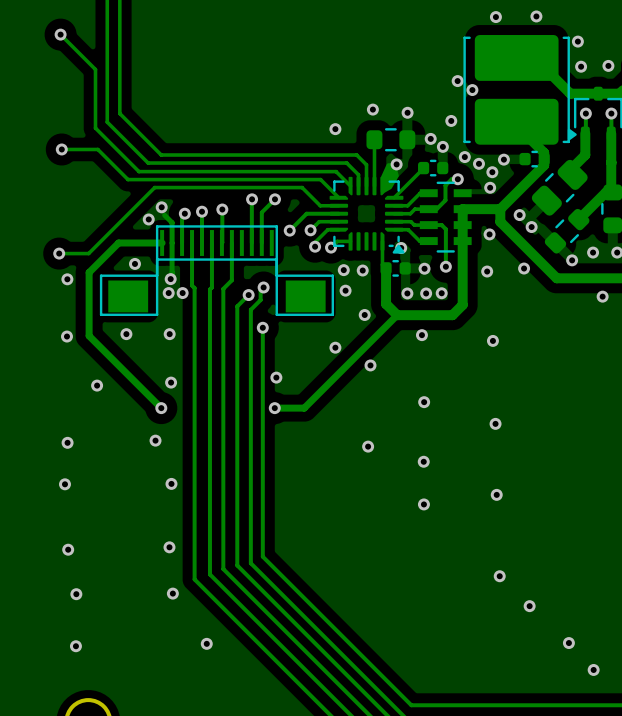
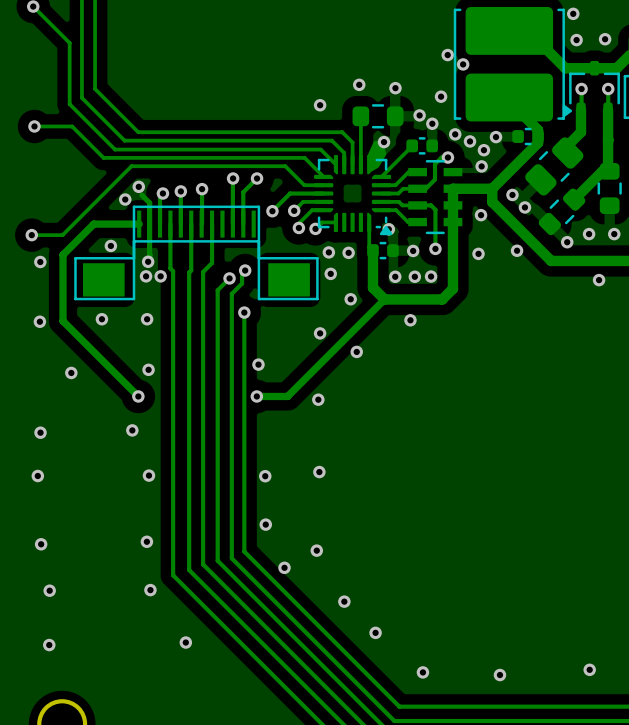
via: (492, 340) -> none
via: (424, 402) -> none
via: none -> (318, 399)
via: (495, 423) -> none
via: (368, 446) -> none
via: (423, 461) -> none
via: none -> (319, 472)
via: none -> (265, 476)
via: (496, 494) -> none
via: (423, 504) -> none
via: none -> (265, 524)
via: none -> (316, 550)
via: none -> (284, 567)
via: (499, 576) -> none
via: none -> (344, 601)
via: (529, 606) -> none
via: none -> (375, 632)
via: (568, 643) -> none
via: none -> (422, 672)
via: none -> (499, 675)

